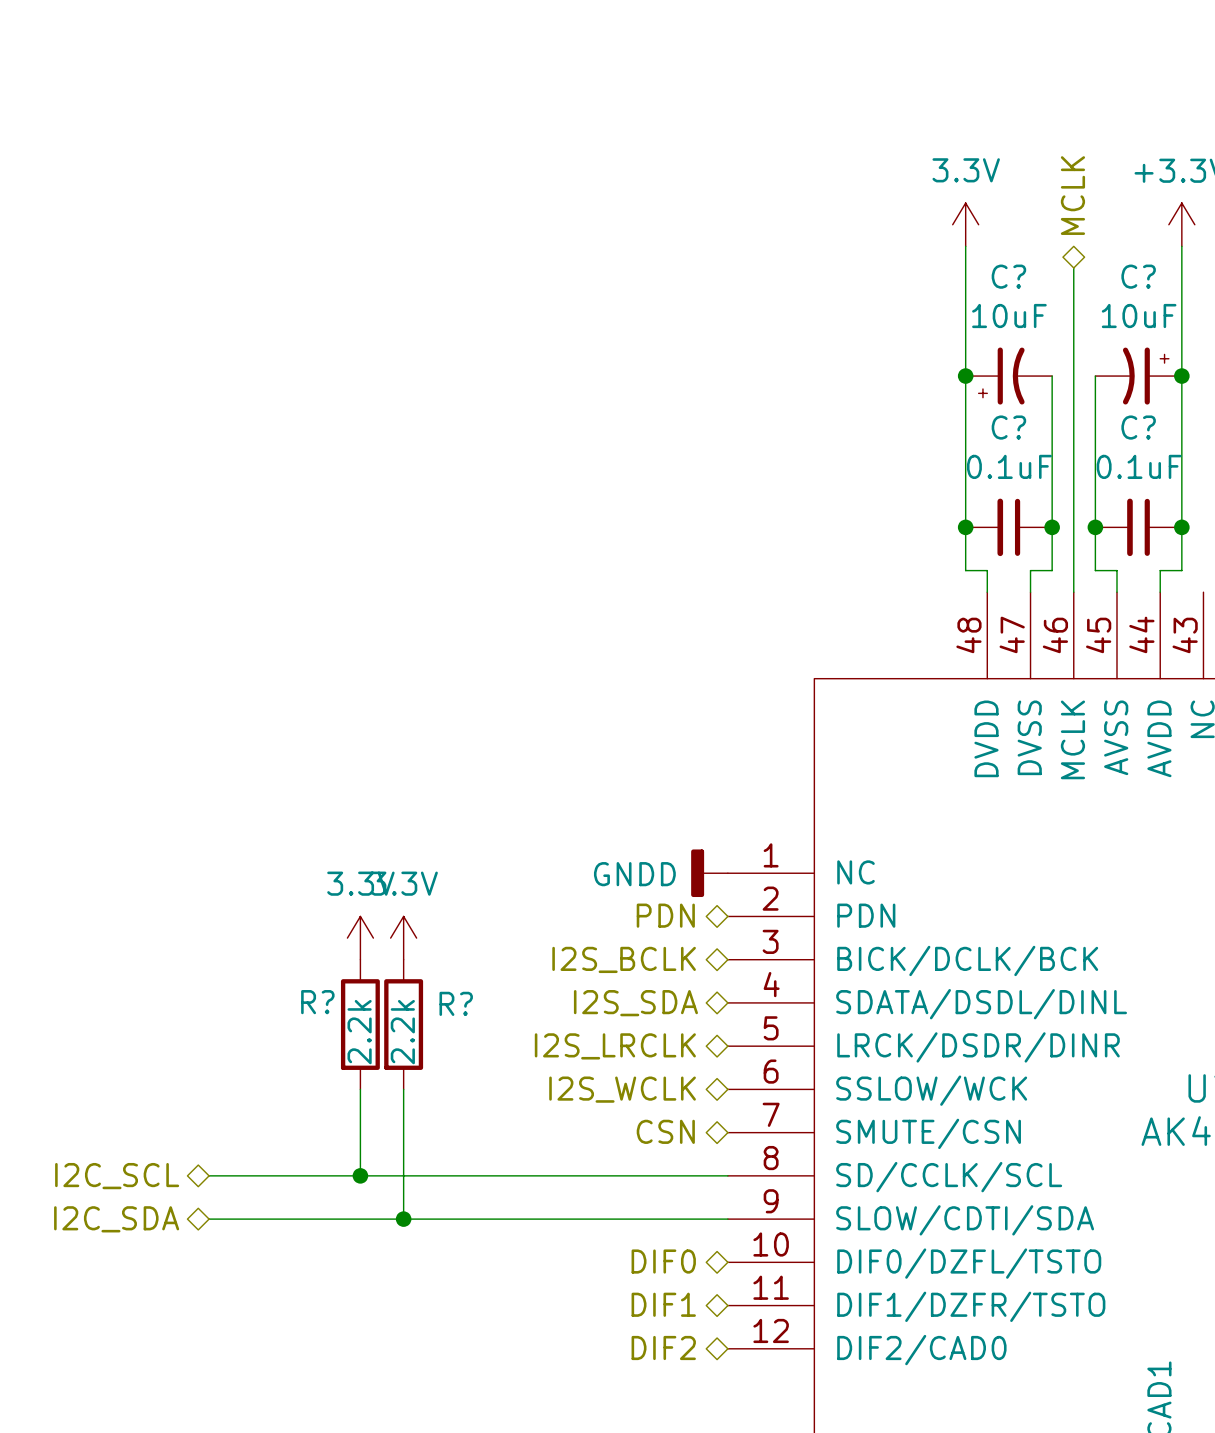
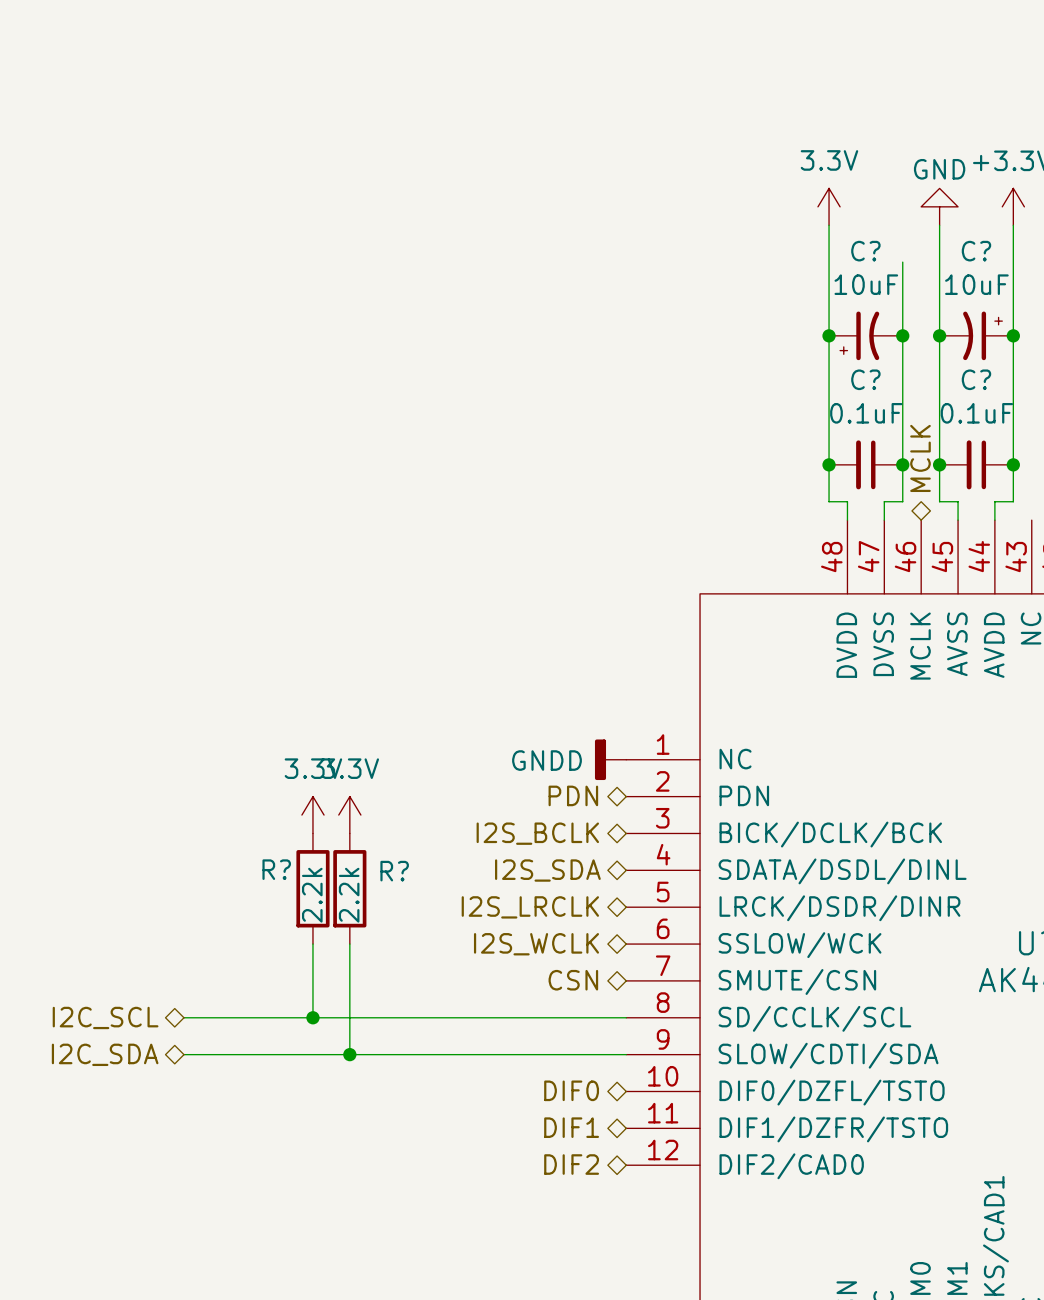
hierarchical label position: MCLK (1072, 195) -> MCLK (920, 458)
power symbol: none -> GND (939, 206)
wire: none -> (939, 225) (939, 335)
wire: (1073, 267) (1073, 592) -> none
wire: none -> (902, 262) (902, 335)
junction: none -> (902, 335)
junction: none -> (939, 335)

